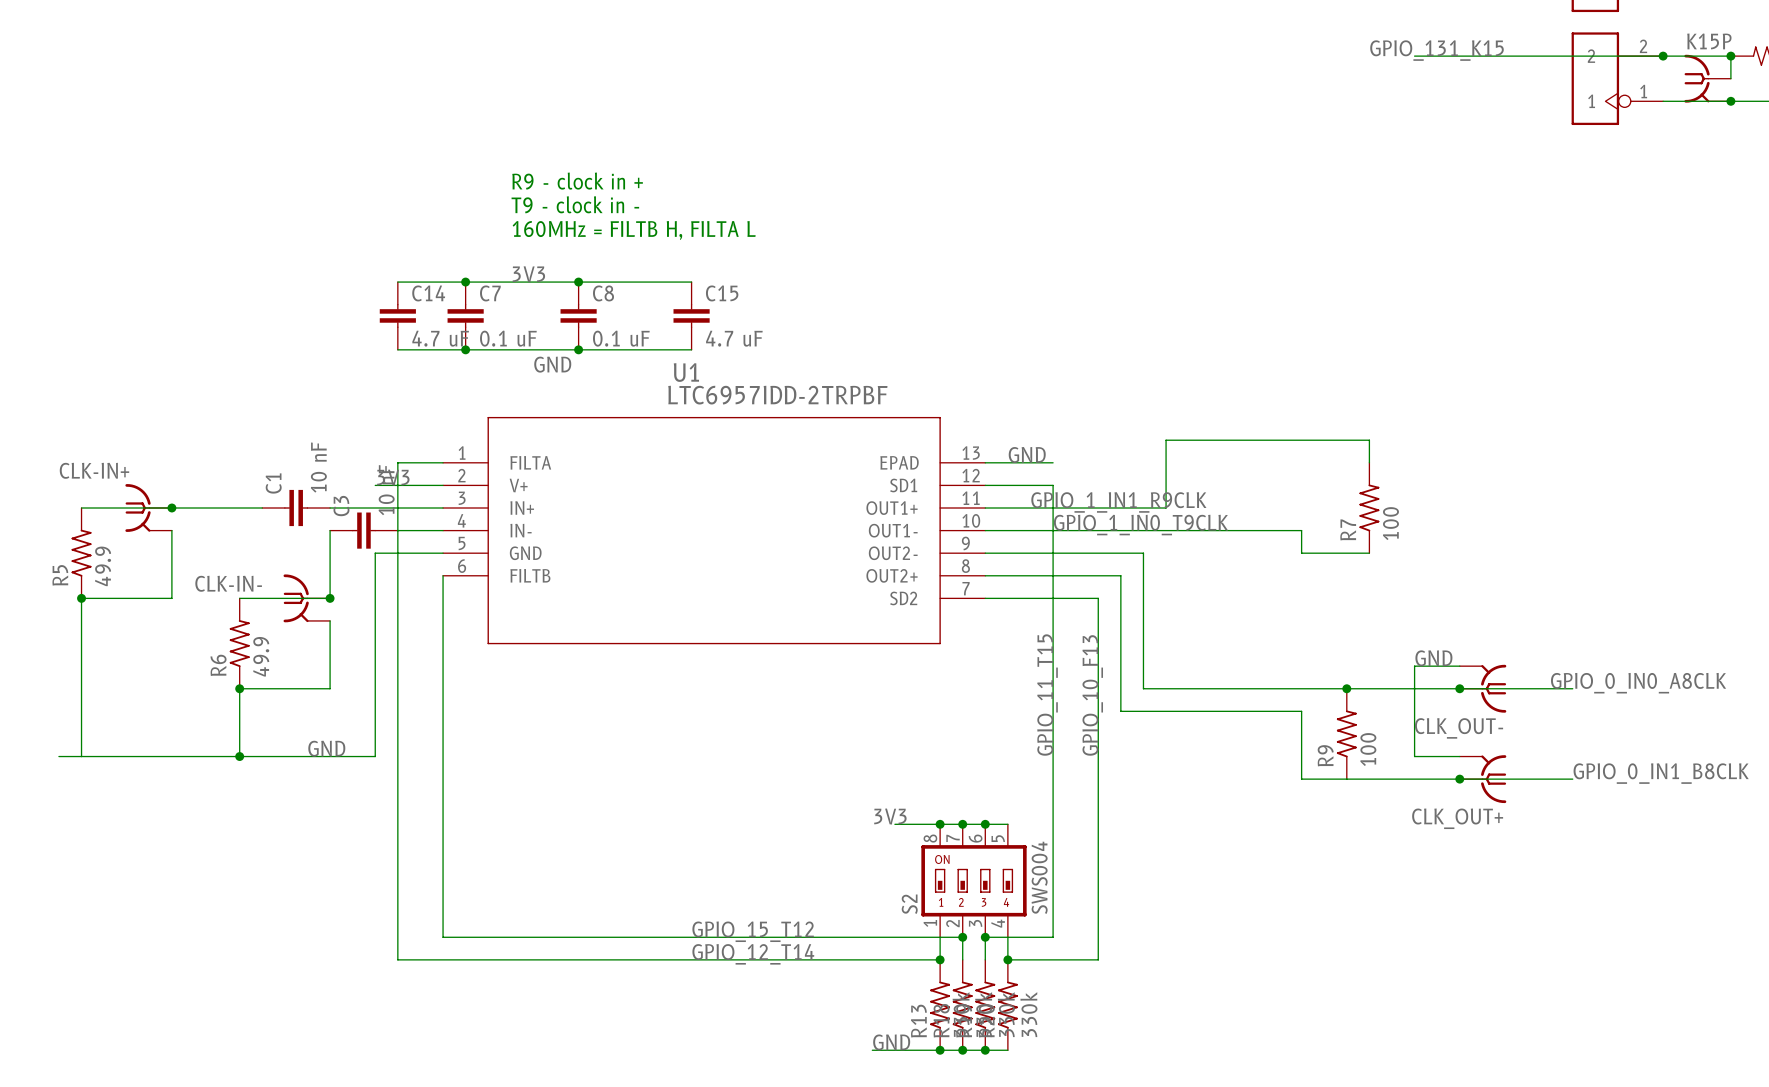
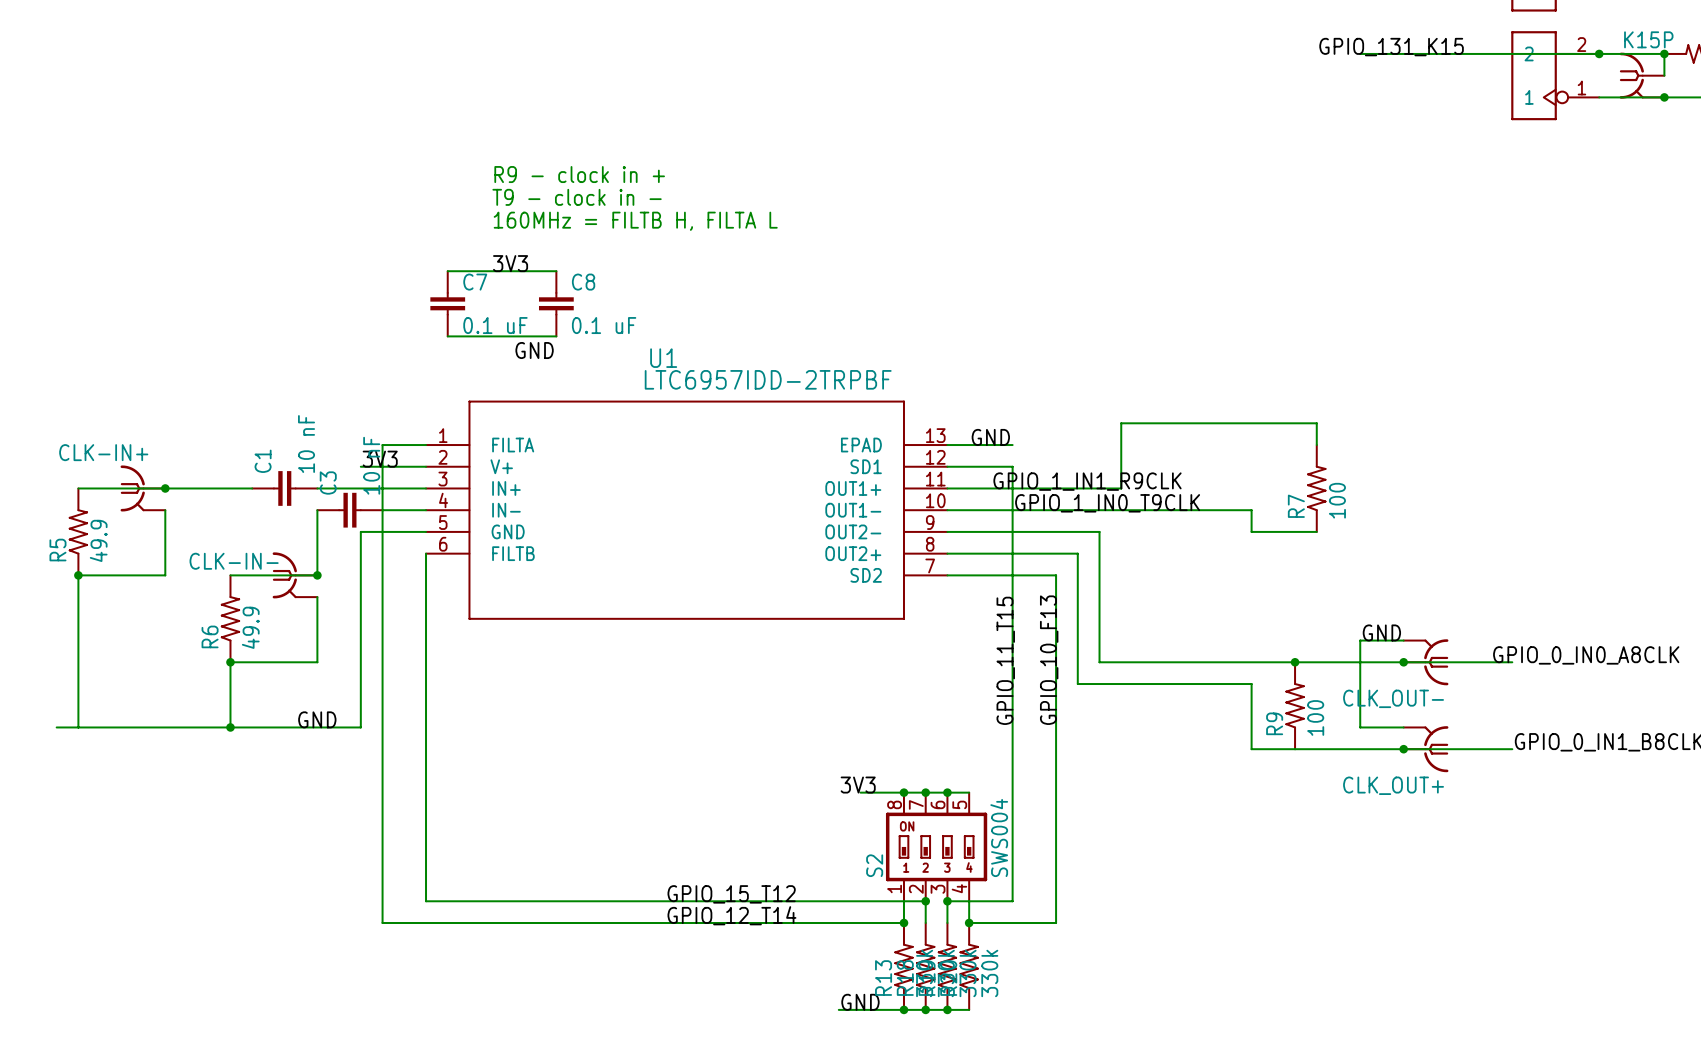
wire: (397, 282) (465, 282) -> none
junction: (465, 282) -> none
wire: (578, 282) (691, 282) -> none
junction: (578, 282) -> none
C14: 4.7 uF (397, 315) -> none
C15: 4.7 uF (691, 315) -> none
wire: (397, 349) (465, 349) -> none
junction: (465, 349) -> none
wire: (578, 349) (691, 349) -> none
junction: (578, 349) -> none

